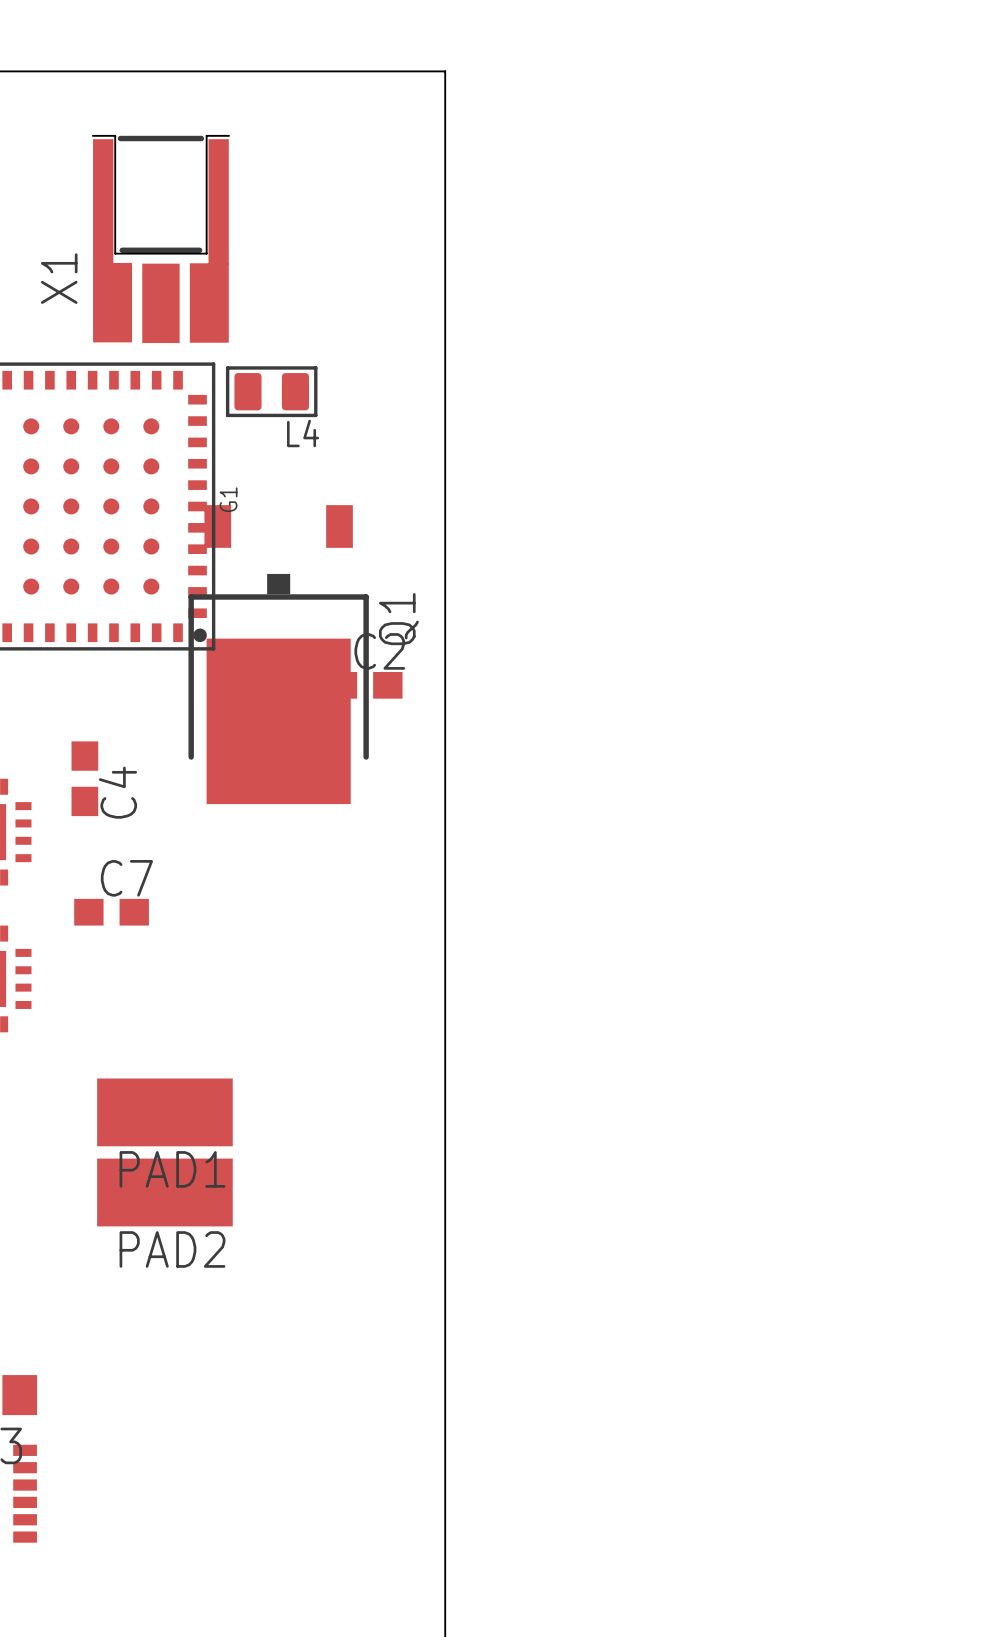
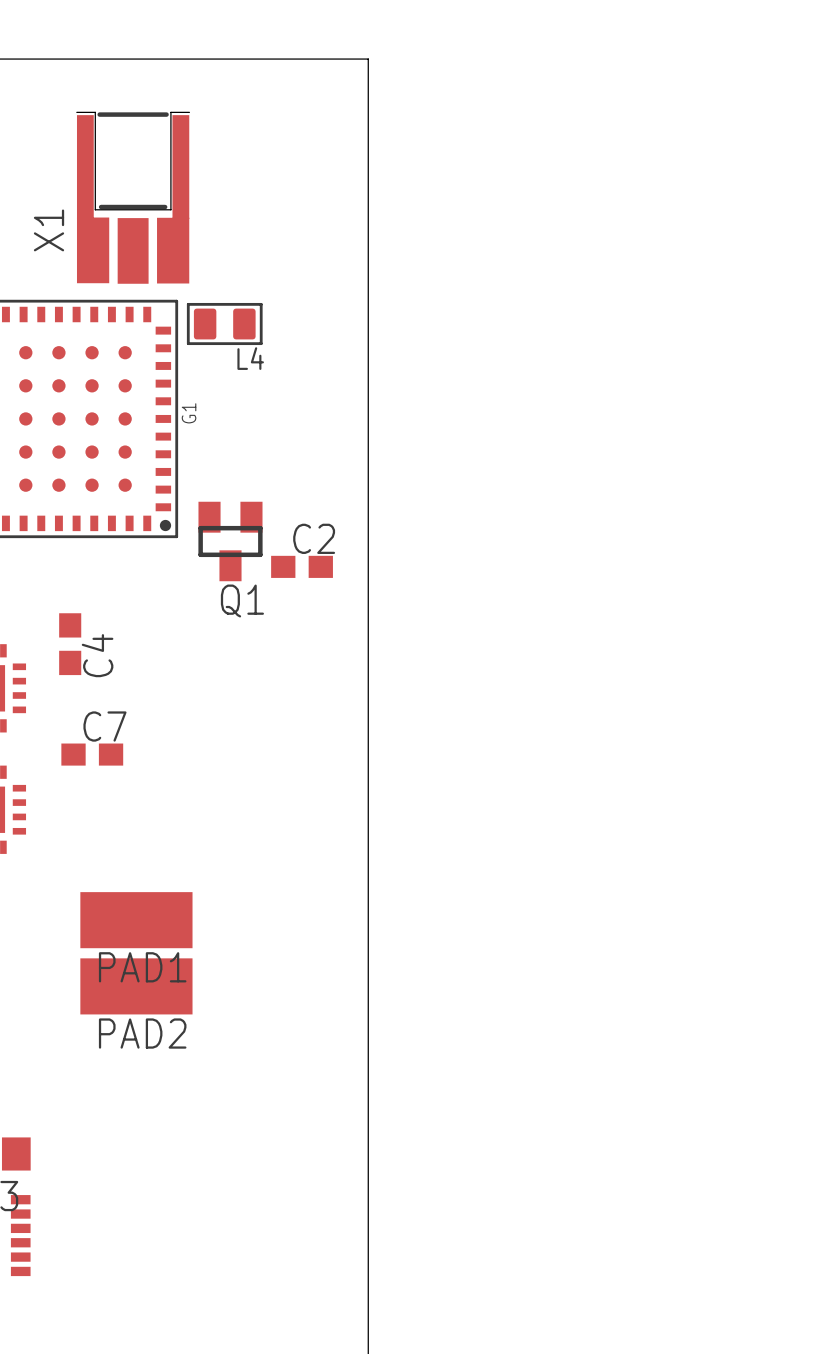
Q1 footprint: [188, 505, 369, 805] -> [198, 501, 263, 582]
Q1 name position: Q1 (398, 619) -> Q1 (242, 601)

